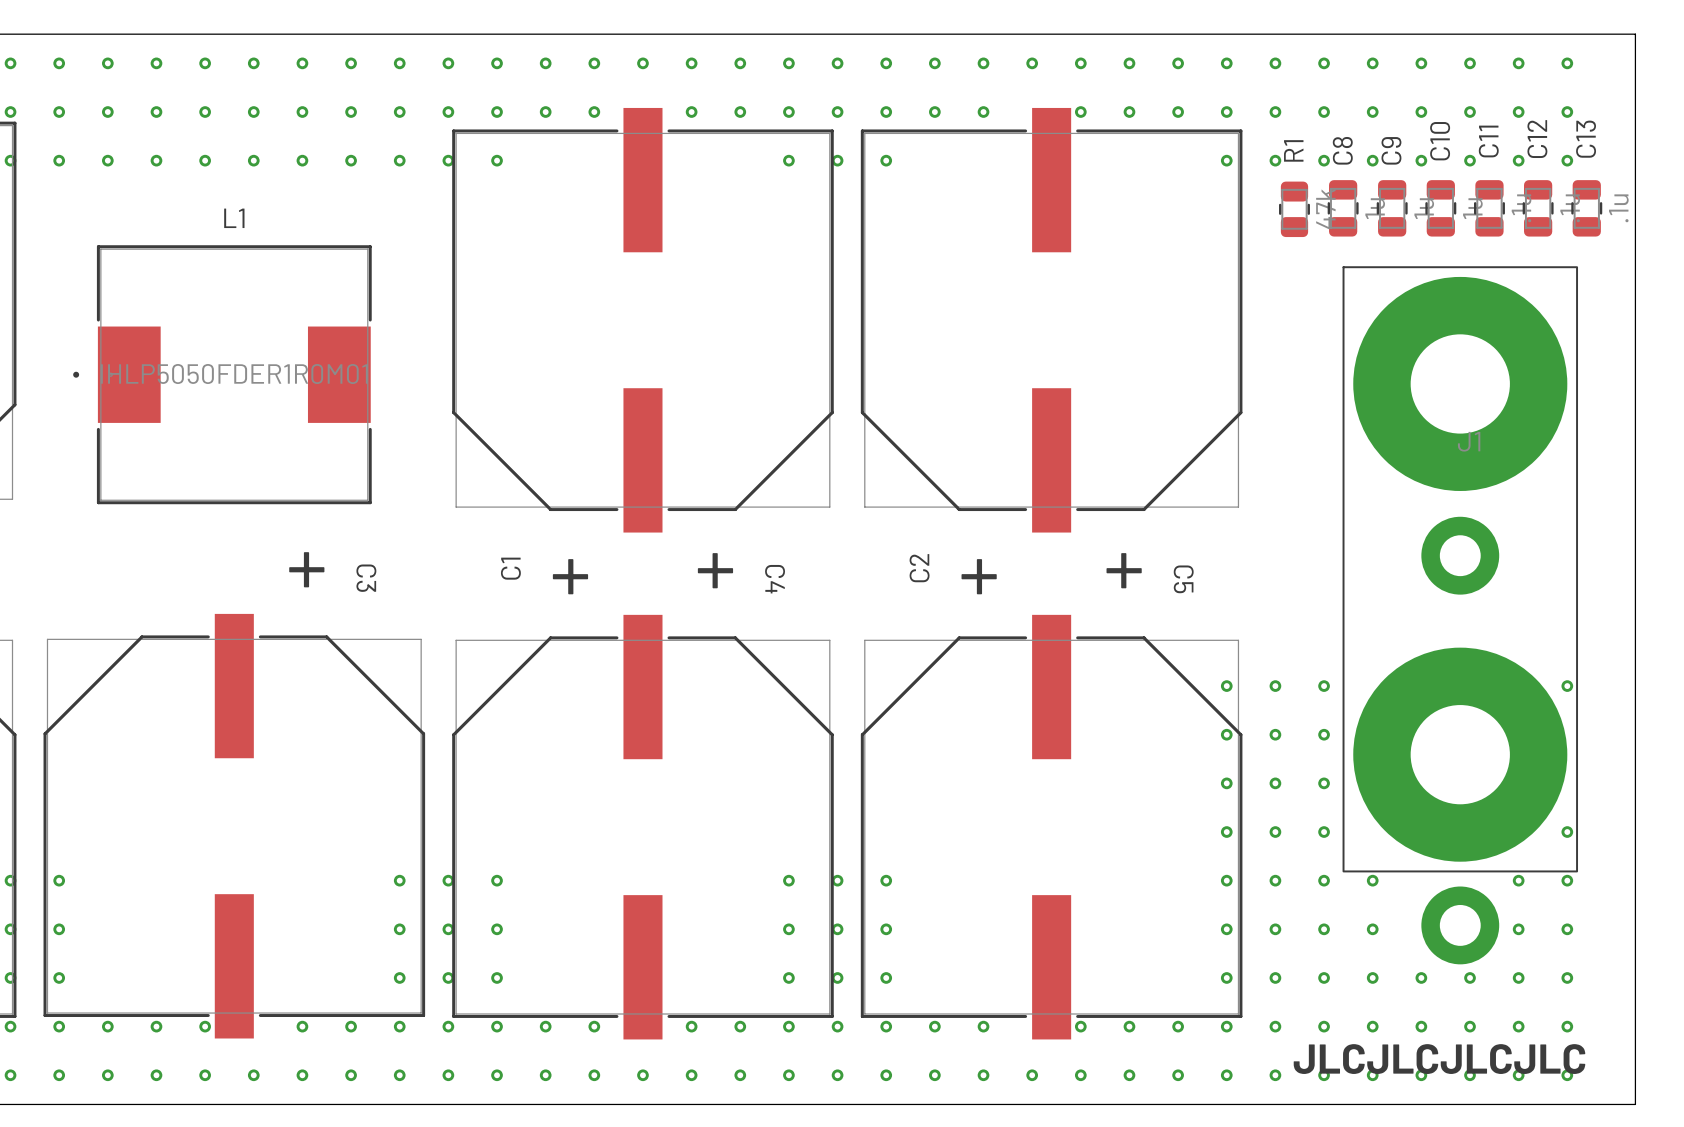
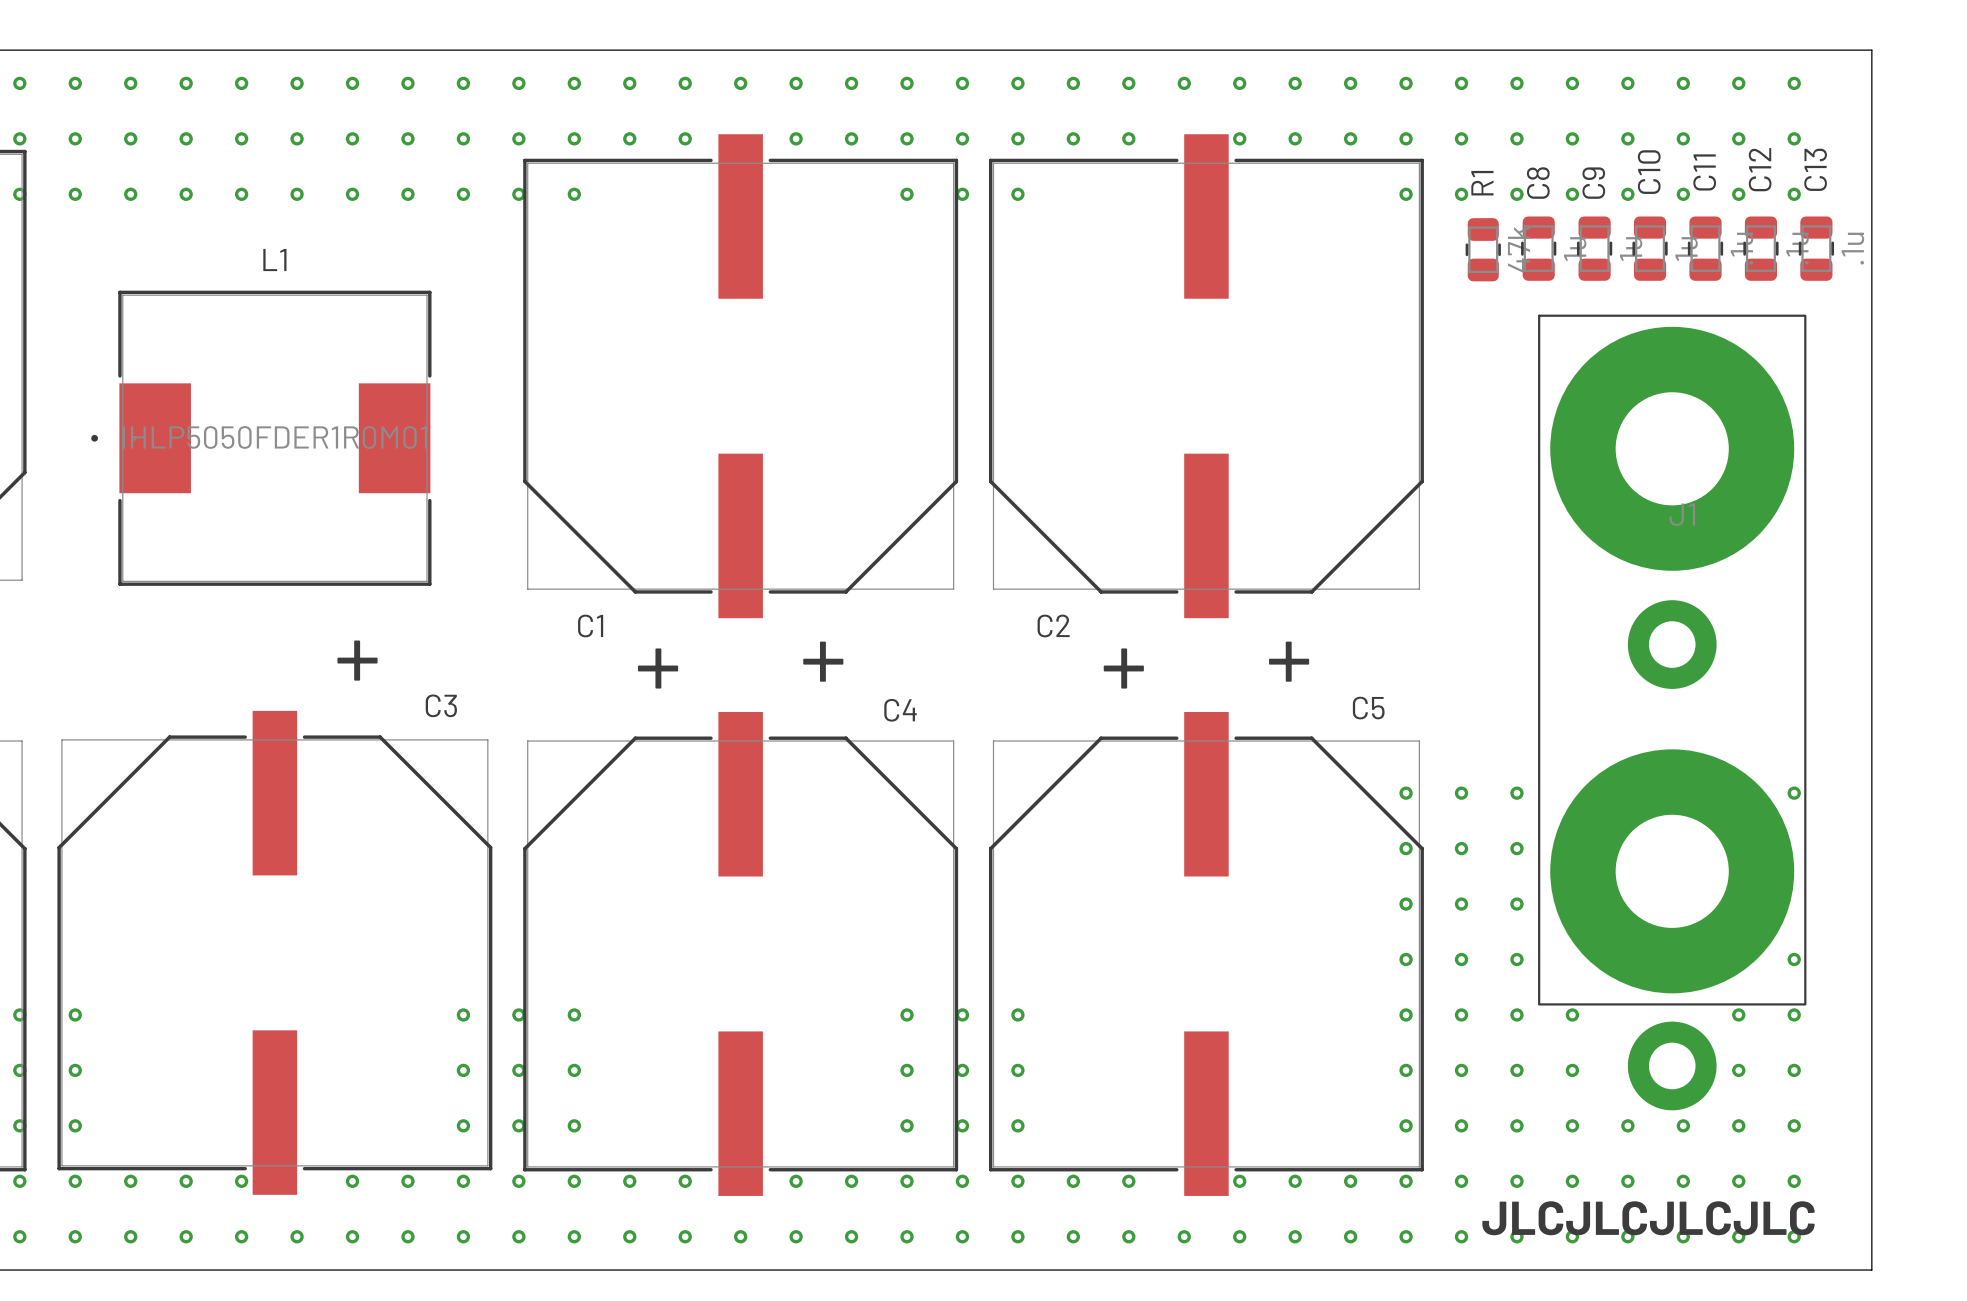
C1 name rotation: 0° (510, 568) -> 90° clockwise (590, 625)
C2 name rotation: 0° (919, 568) -> 90° clockwise (1053, 625)
C3 name rotation: 0° (366, 578) -> 90° counterclockwise (441, 705)
C4 name rotation: 0° (775, 579) -> 90° counterclockwise (900, 710)
C5 name rotation: 0° (1183, 579) -> 90° counterclockwise (1368, 708)

